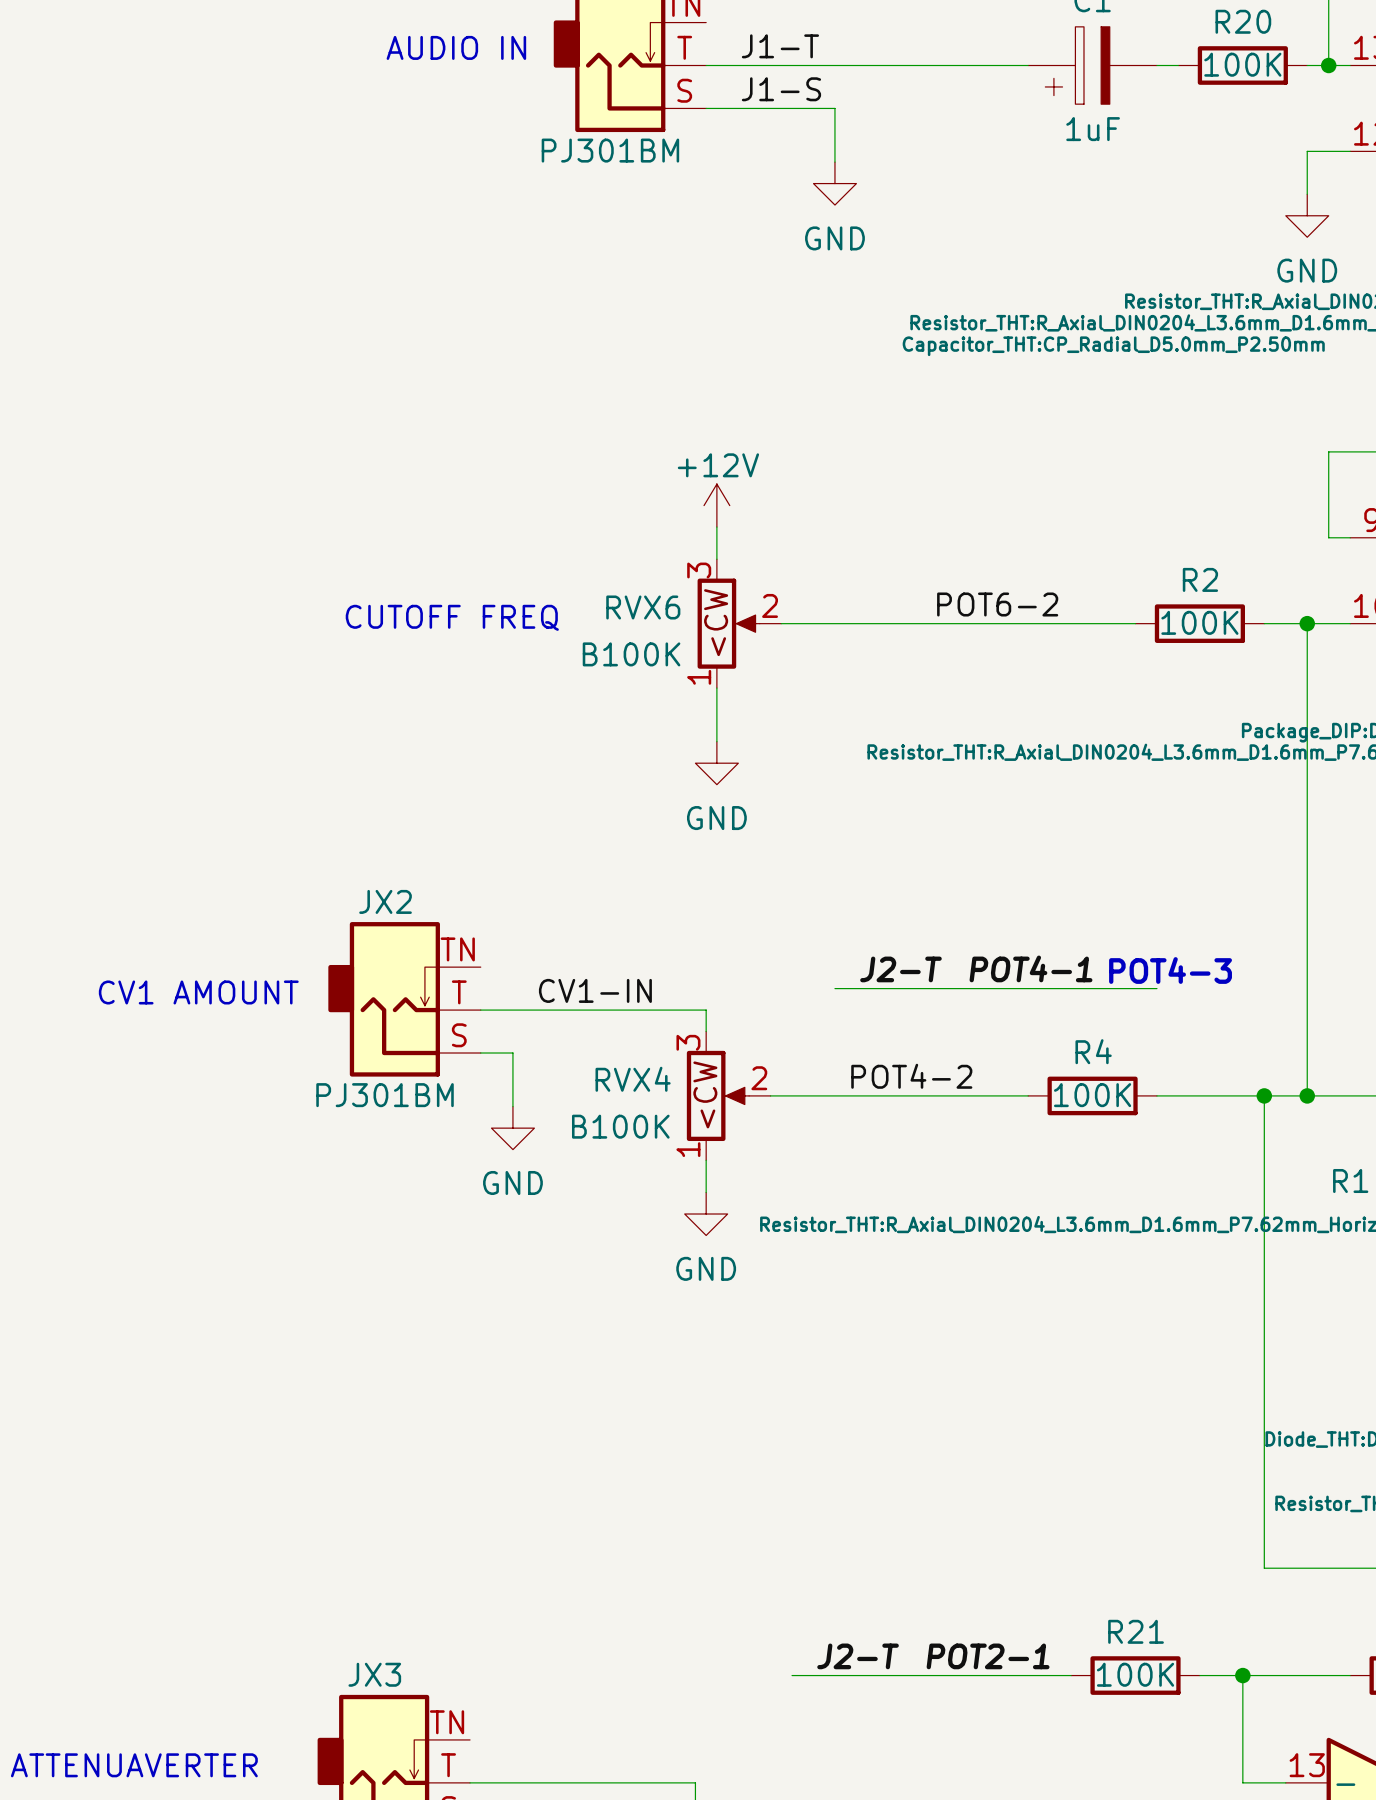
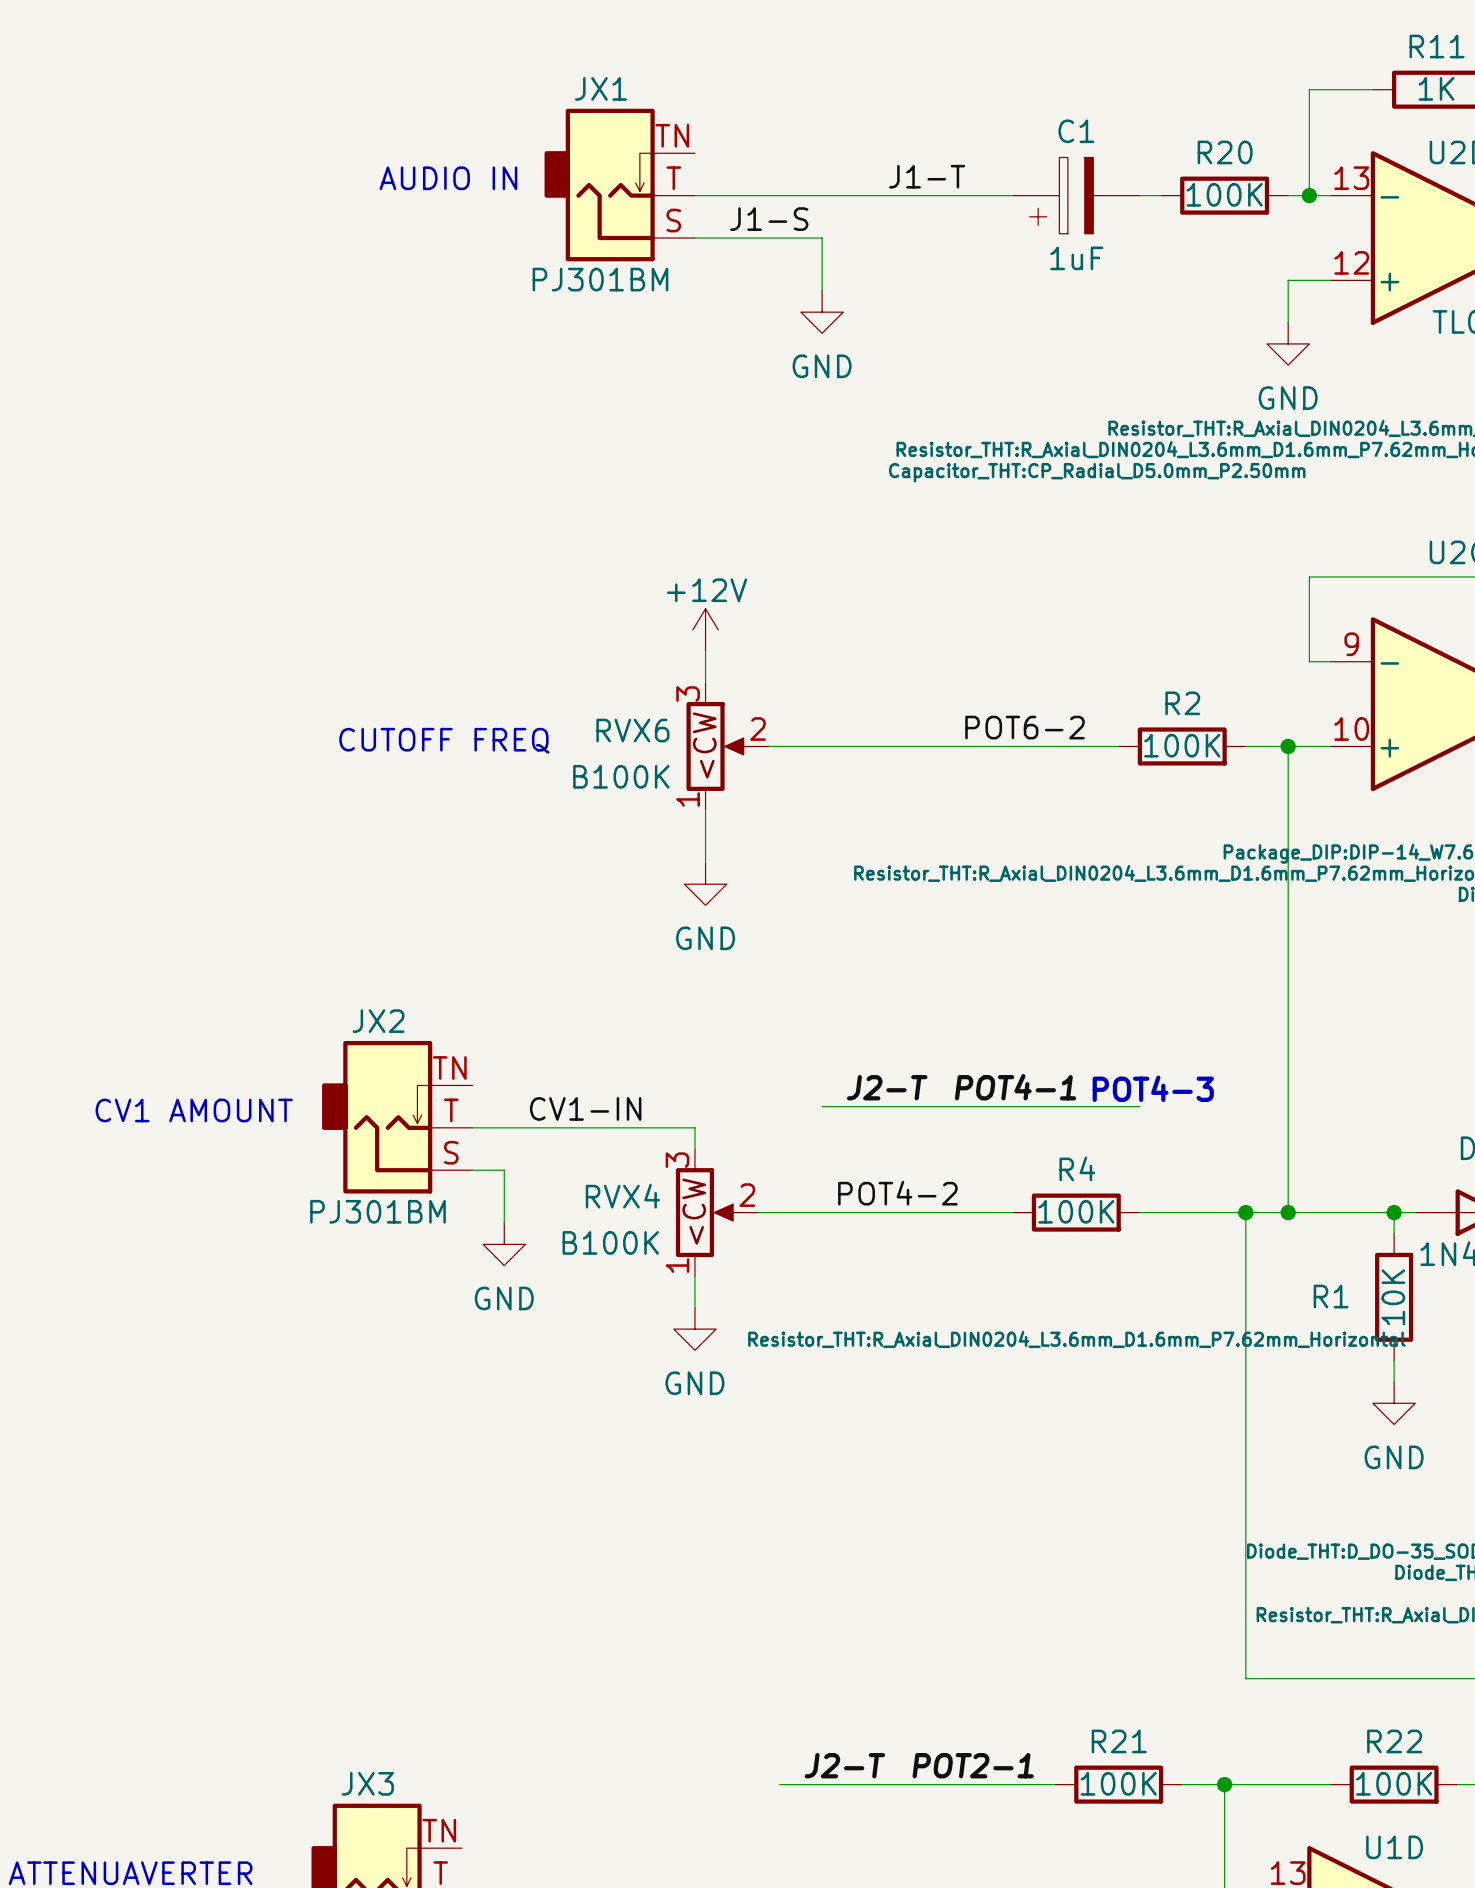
label position: J1-T (780, 46) -> J1-T (927, 176)
label position: POT6-2 (997, 604) -> POT6-2 (1025, 727)

